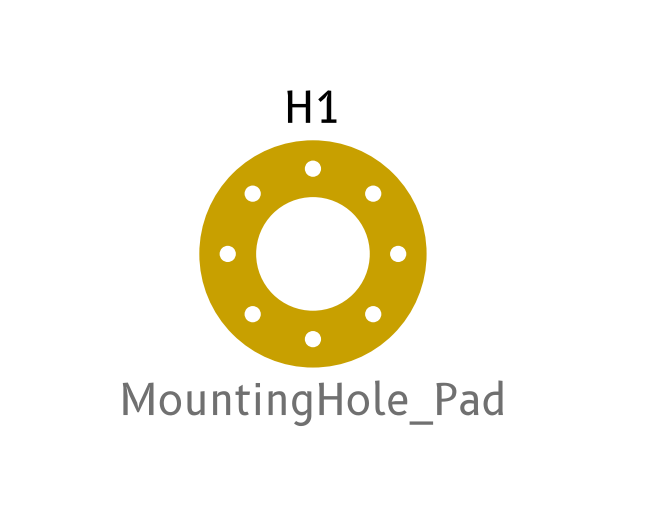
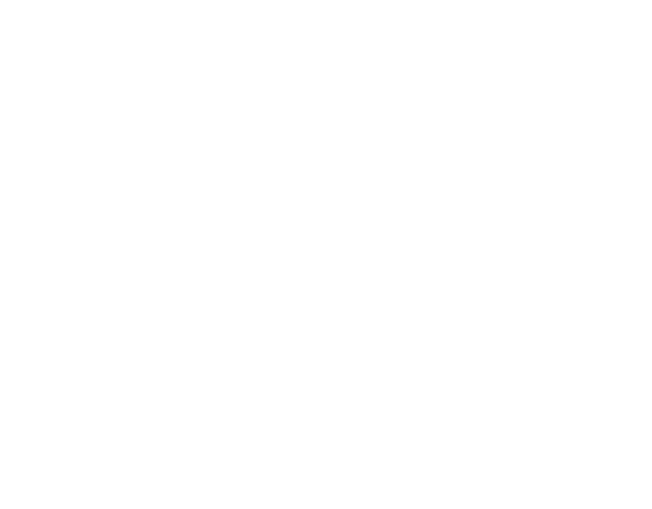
H1: MountingHole_Pad (312, 253) -> none

